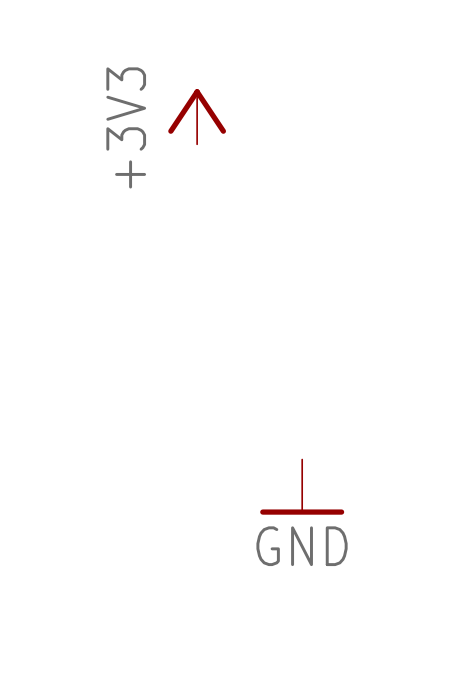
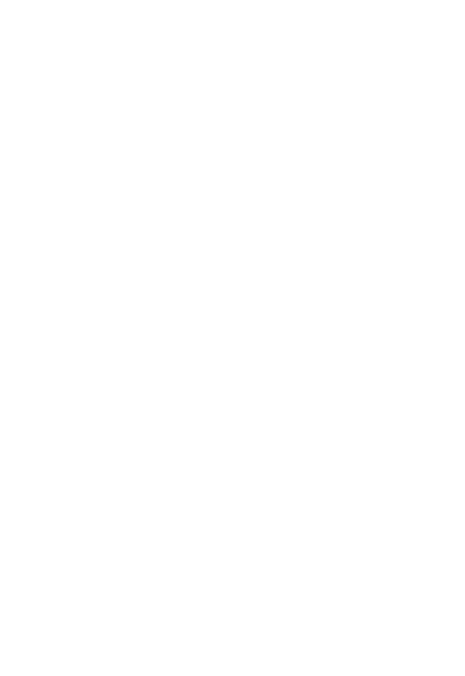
power symbol: +3V3 (197, 116) -> none
power symbol: GND (302, 487) -> none

